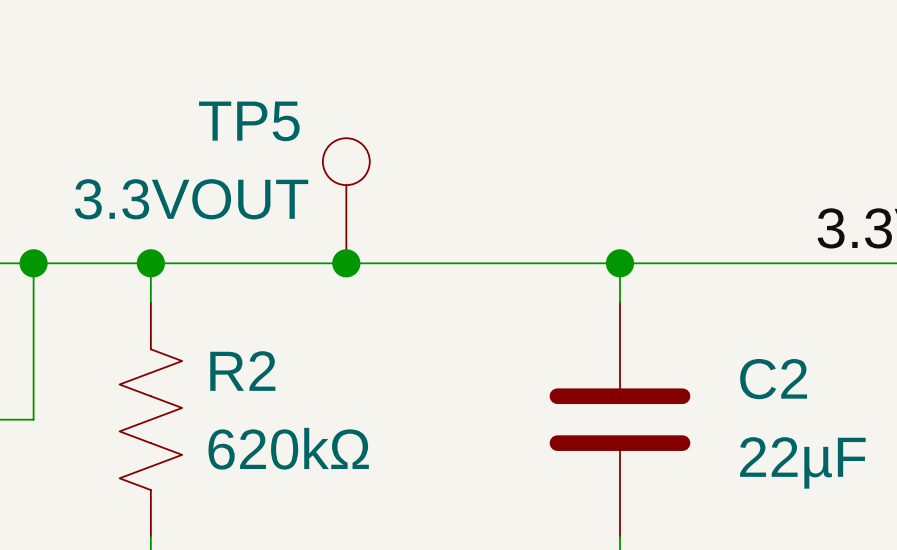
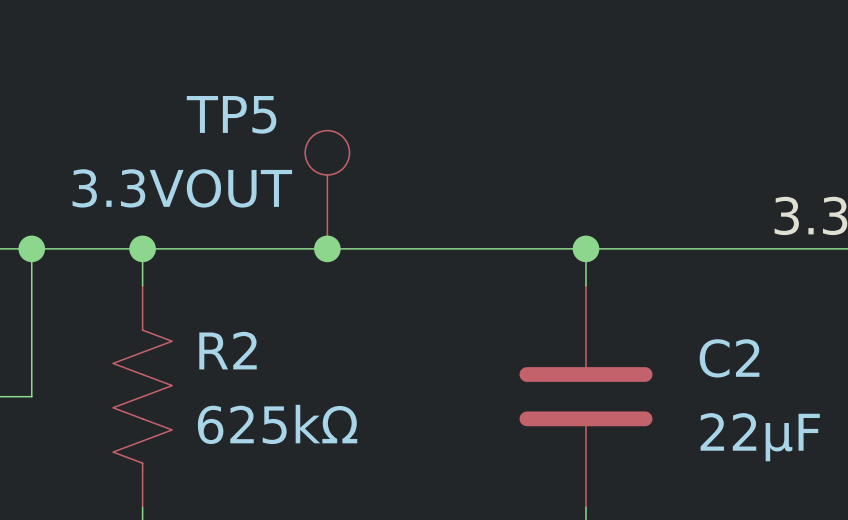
R2 value: 620kΩ (288, 448) -> 625kΩ (277, 424)

